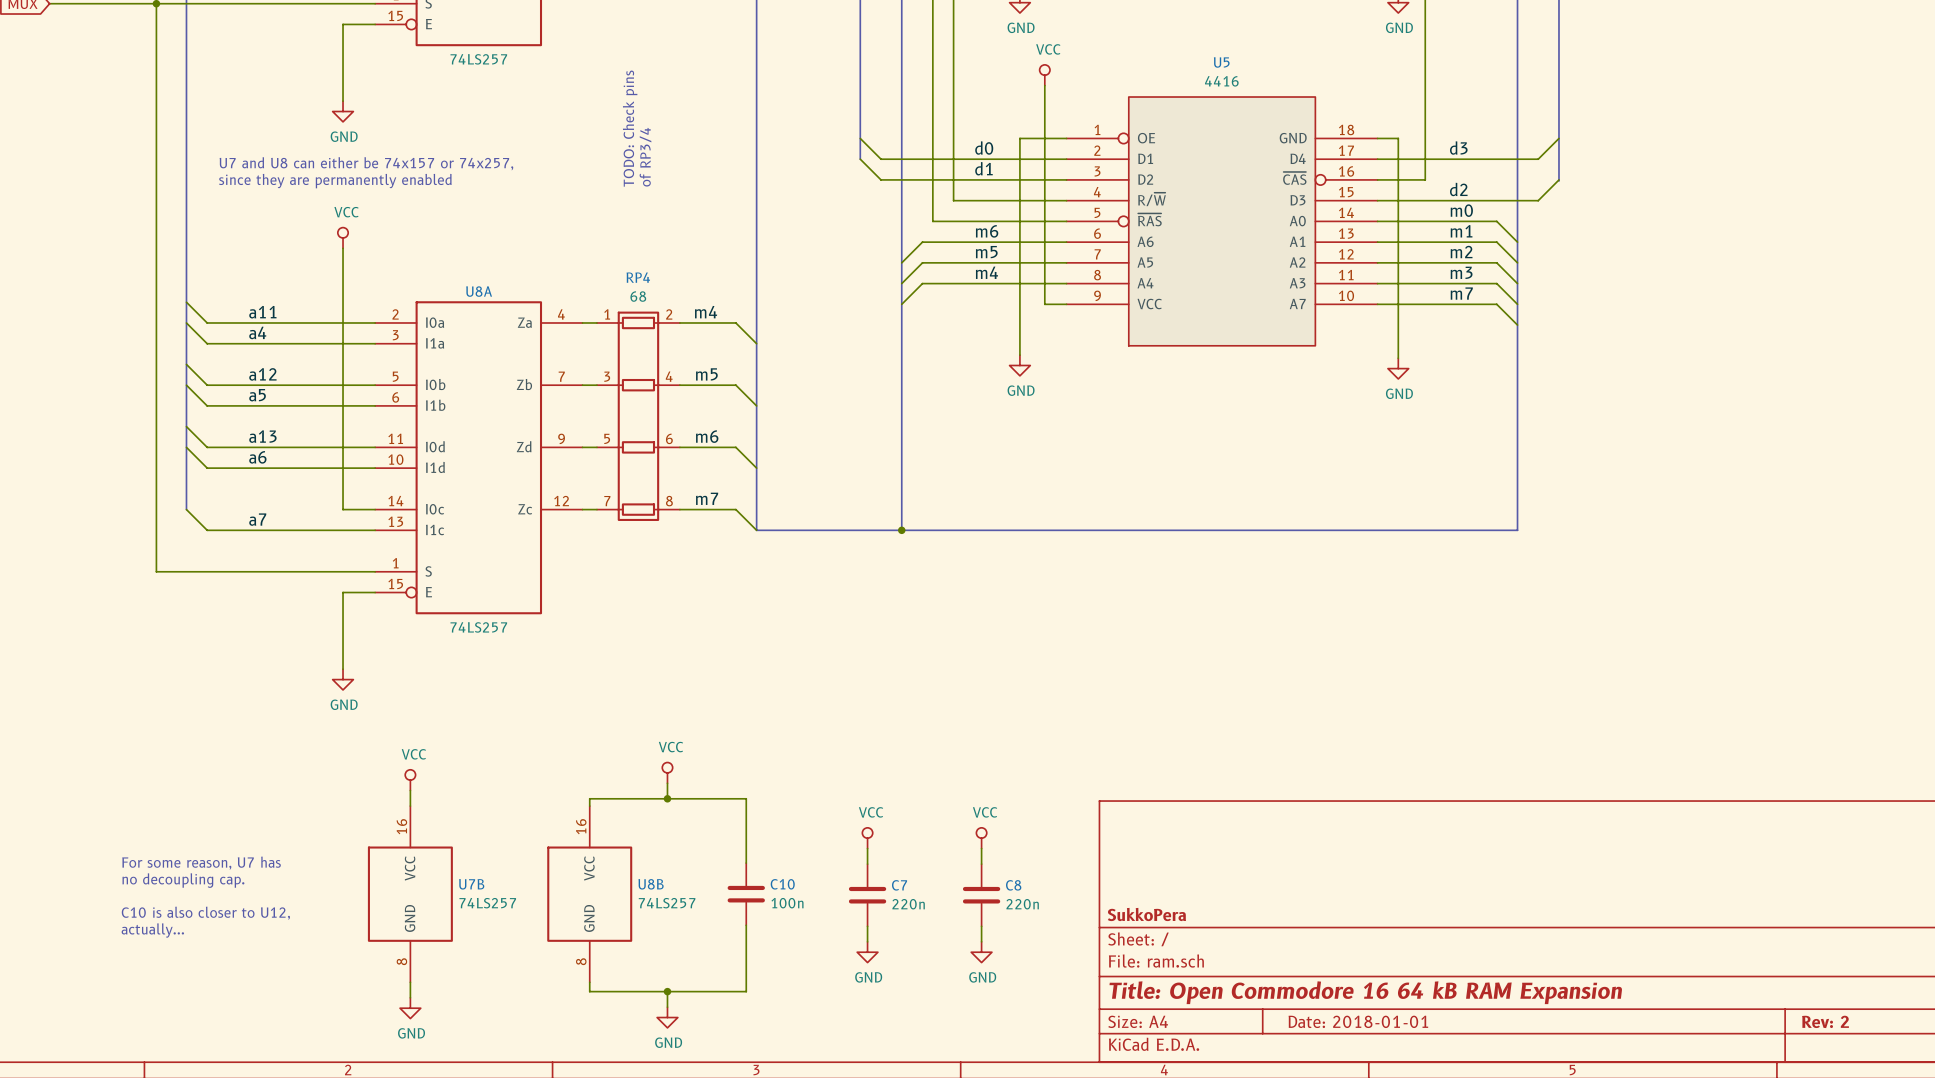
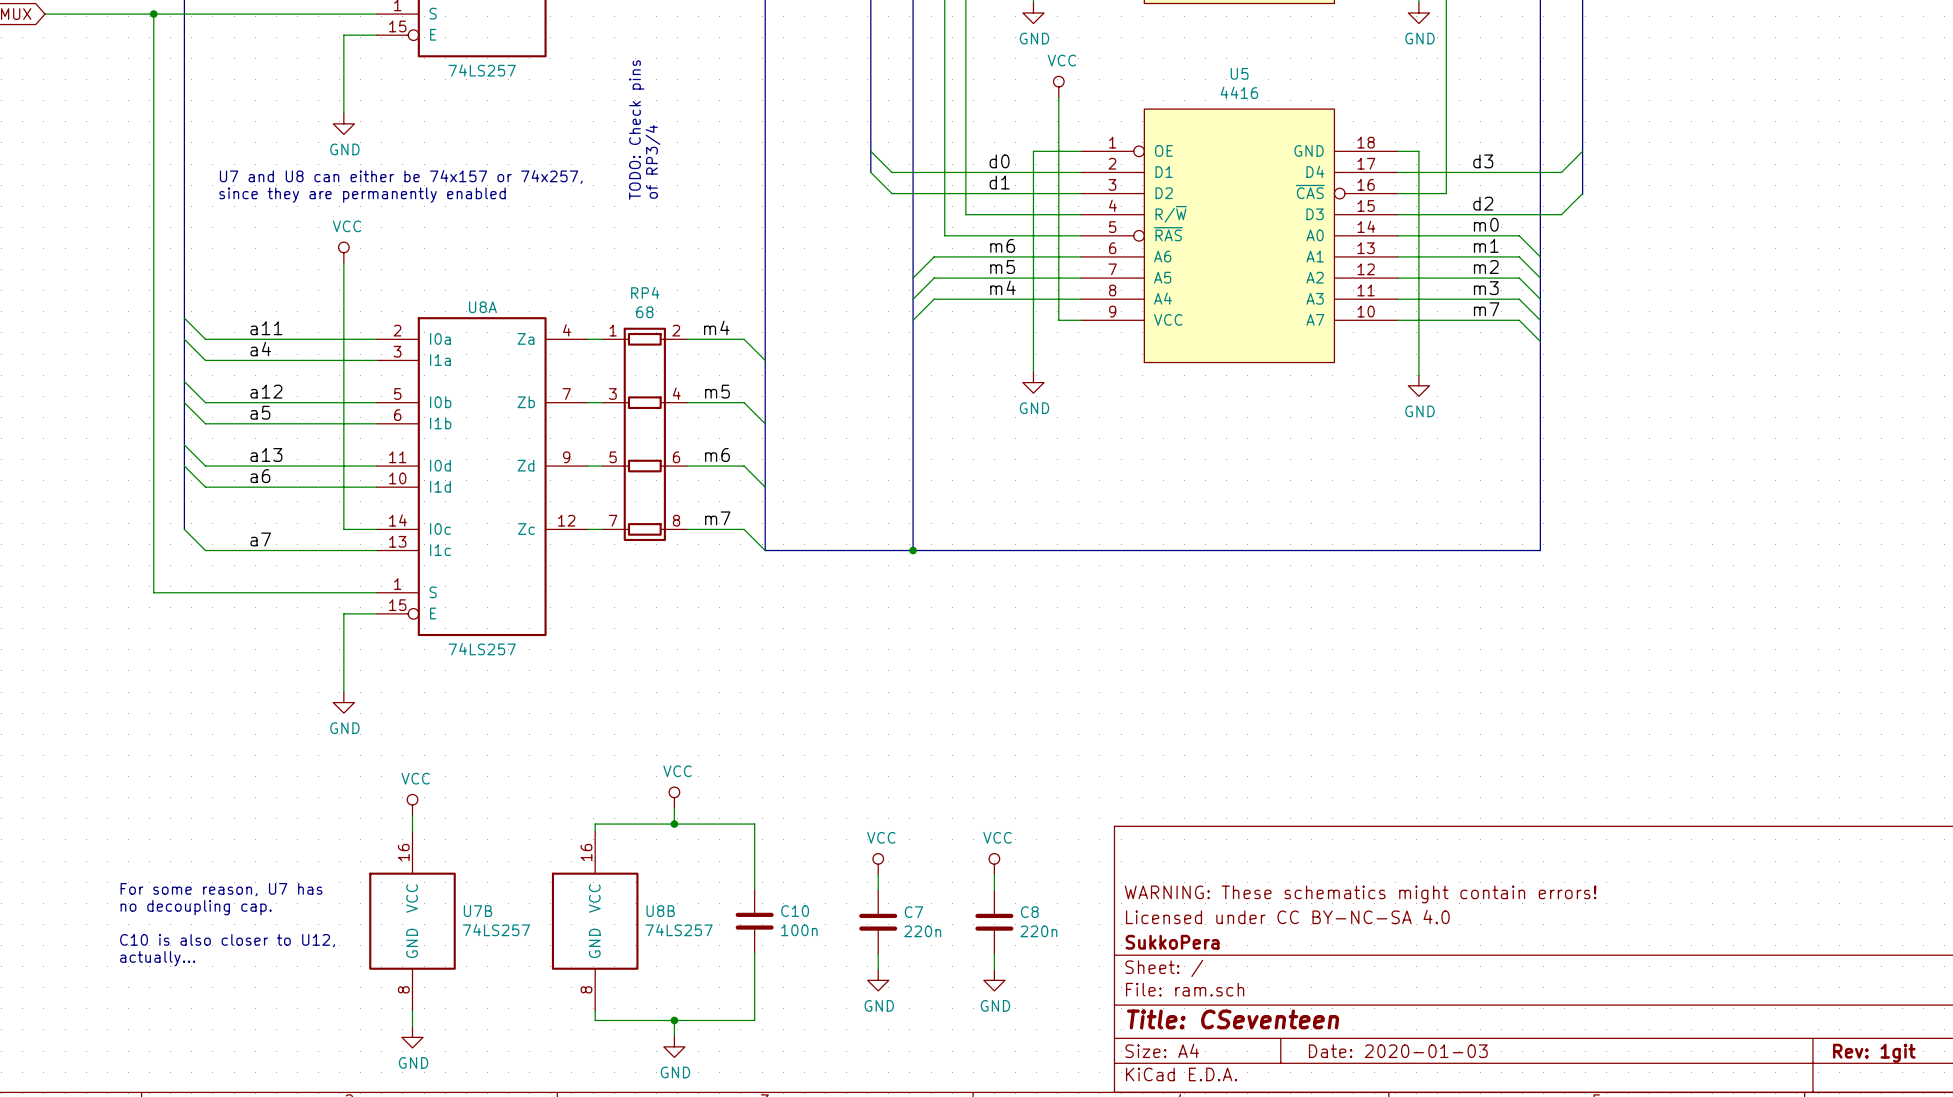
title block: none -> WARNING: These schematics might contain errors! (1360, 894)
title block: none -> Licensed under CC BY-NC-SA 4.0 (1287, 917)
title block: Title: Open Commodore 16 64 kB RAM Expansion (1365, 992) -> Title: CSeventeen (1233, 1019)
title block: Date: 2018-01-01 (1358, 1021) -> Date: 2020-01-03 (1398, 1051)
title block: Rev: 2 (1825, 1021) -> Rev: 1git (1874, 1053)

